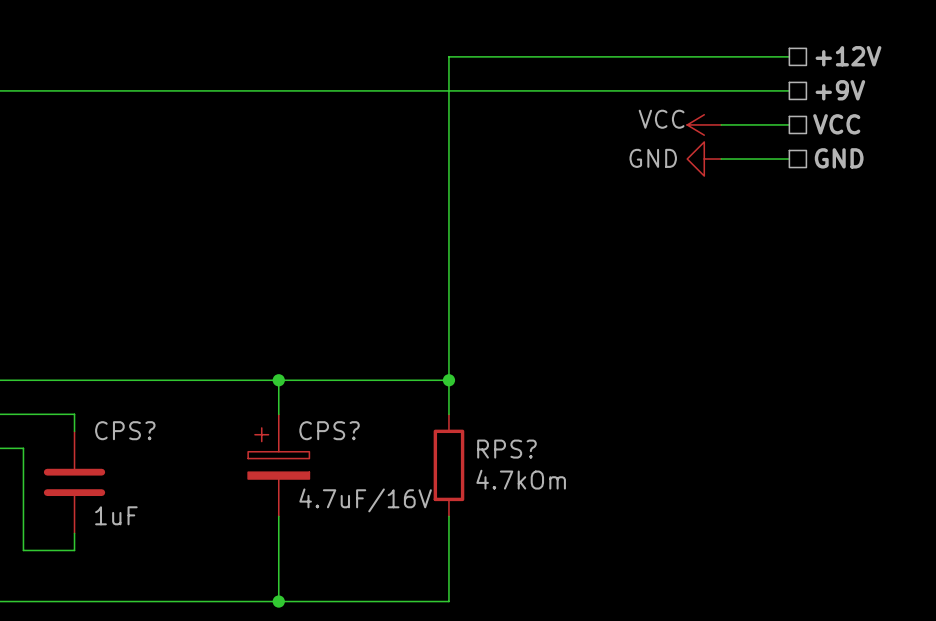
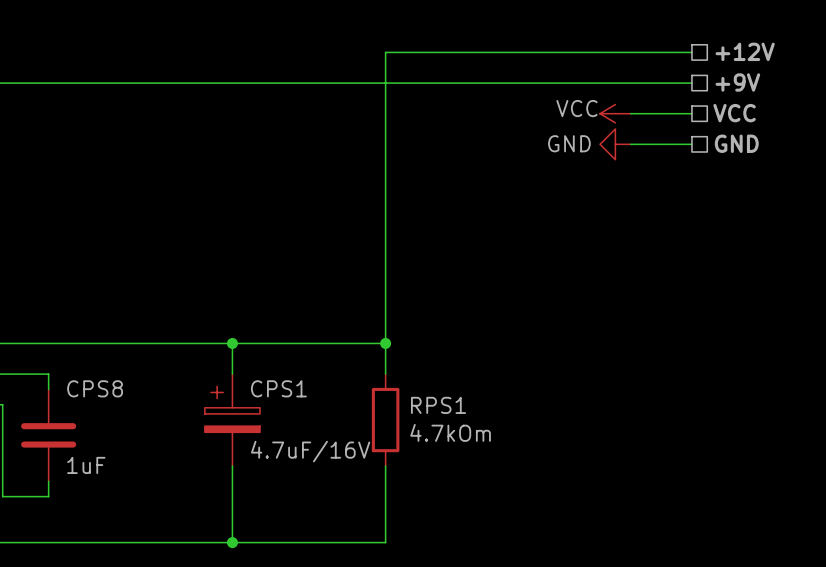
CPS? name: CPS? (125, 430) -> CPS8 (95, 388)
CPS? name: CPS? (329, 430) -> CPS1 (278, 388)
RPS? name: RPS? (506, 449) -> RPS1 (438, 405)

